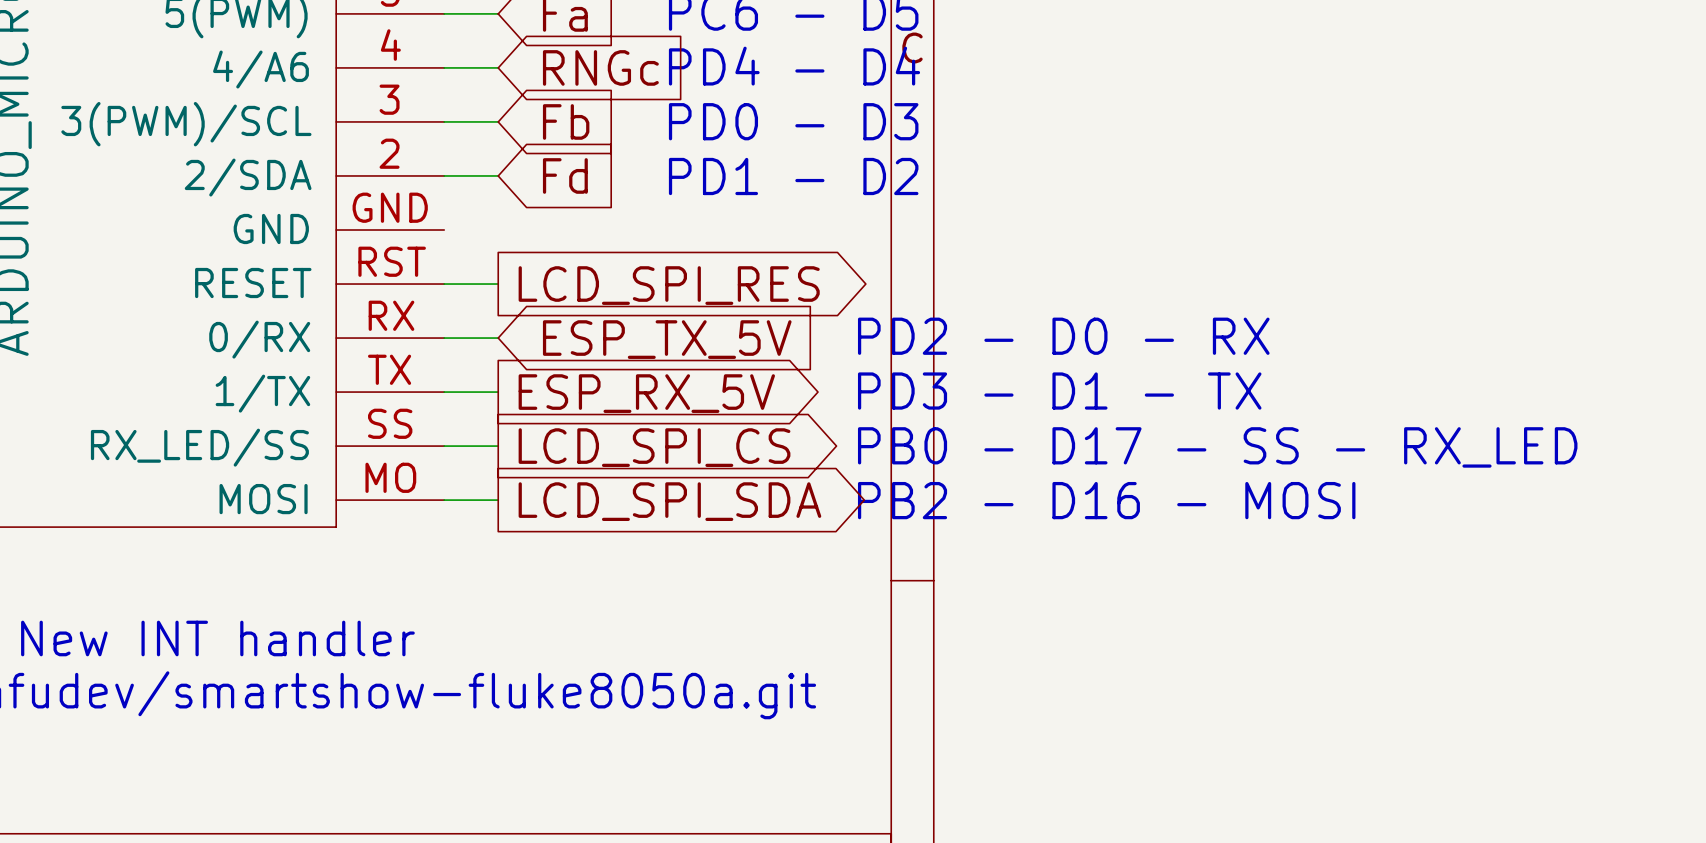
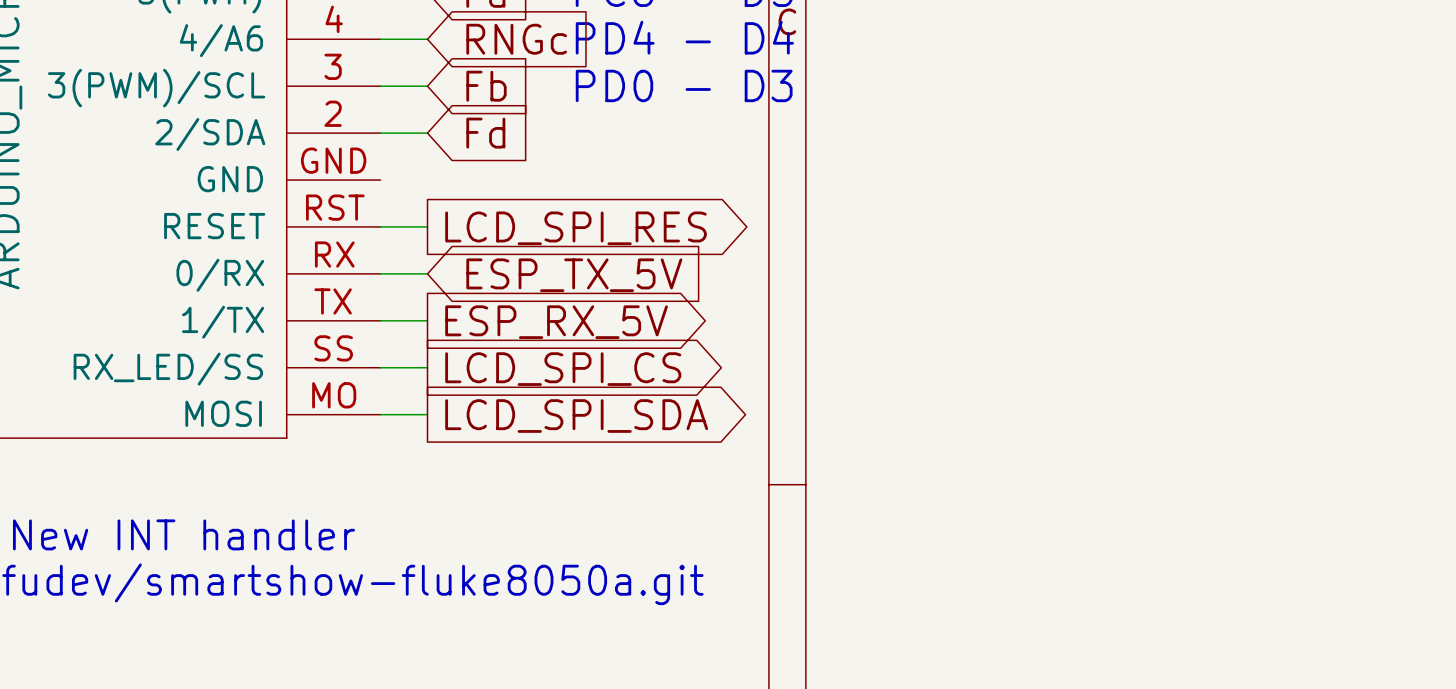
text: PD1 - D2 (793, 176) -> none
text: PD2 - D0 - RX (1063, 336) -> none
text: PD3 - D1 - TX (1059, 391) -> none
text: PB0 - D17 - SS - RX_LED (1217, 447) -> none
text: PB2 - D16 - MOSI (1106, 500) -> none

